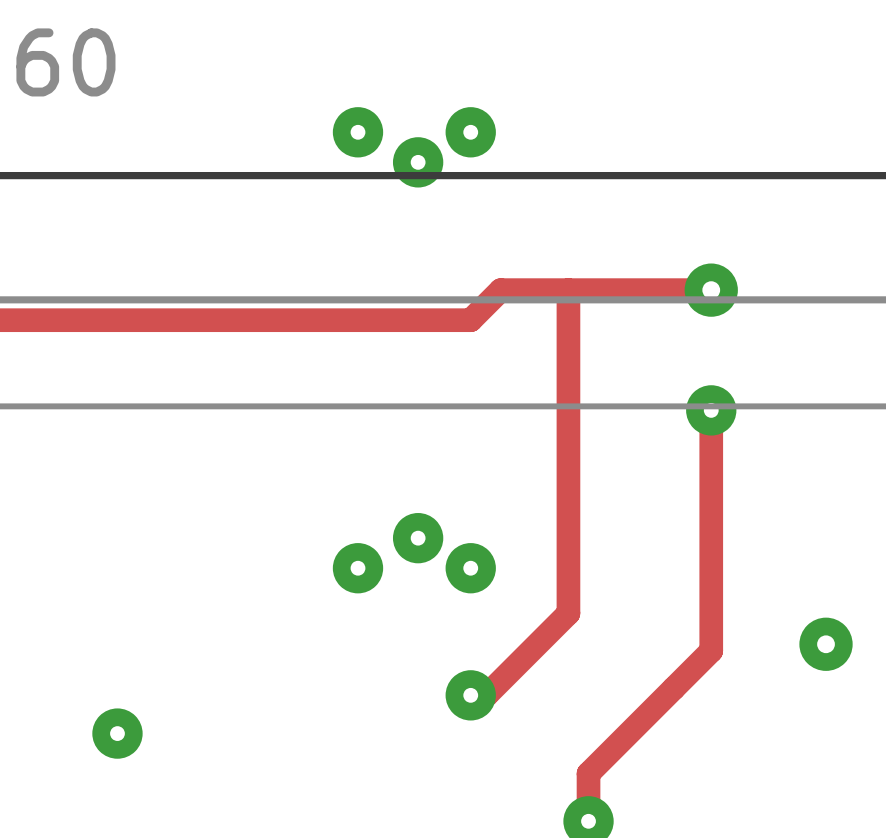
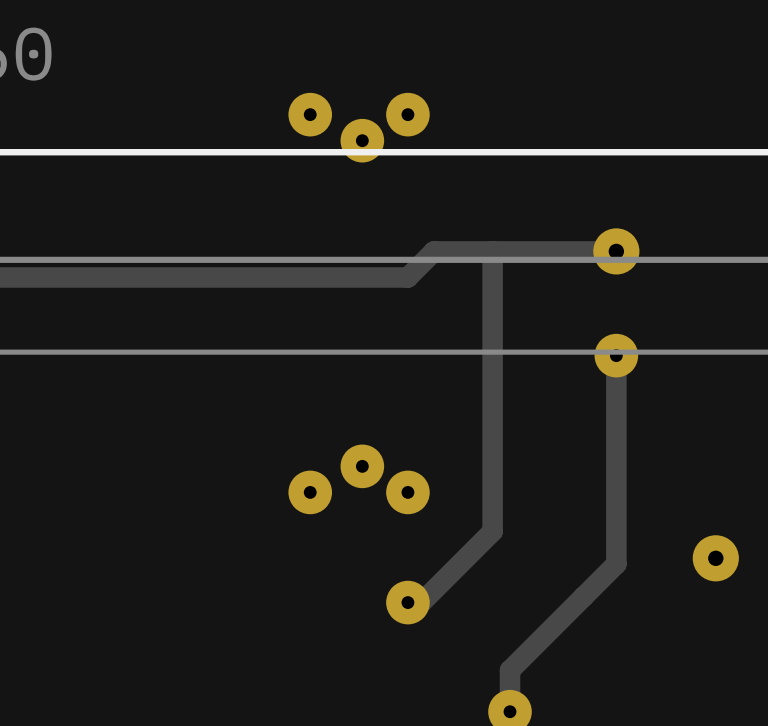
via: (117, 733) -> none

